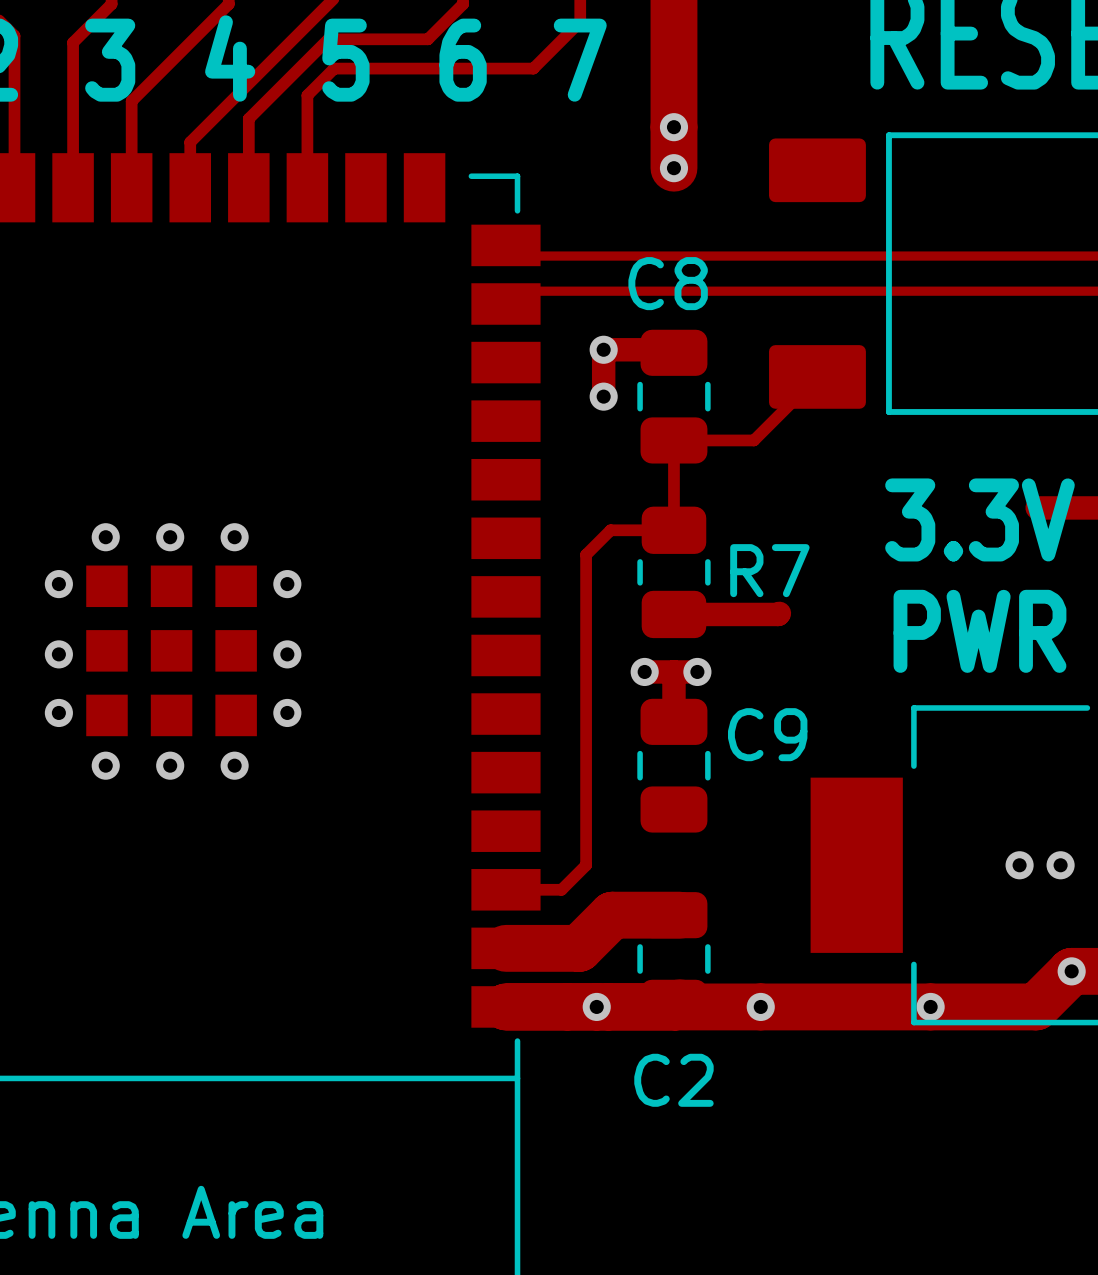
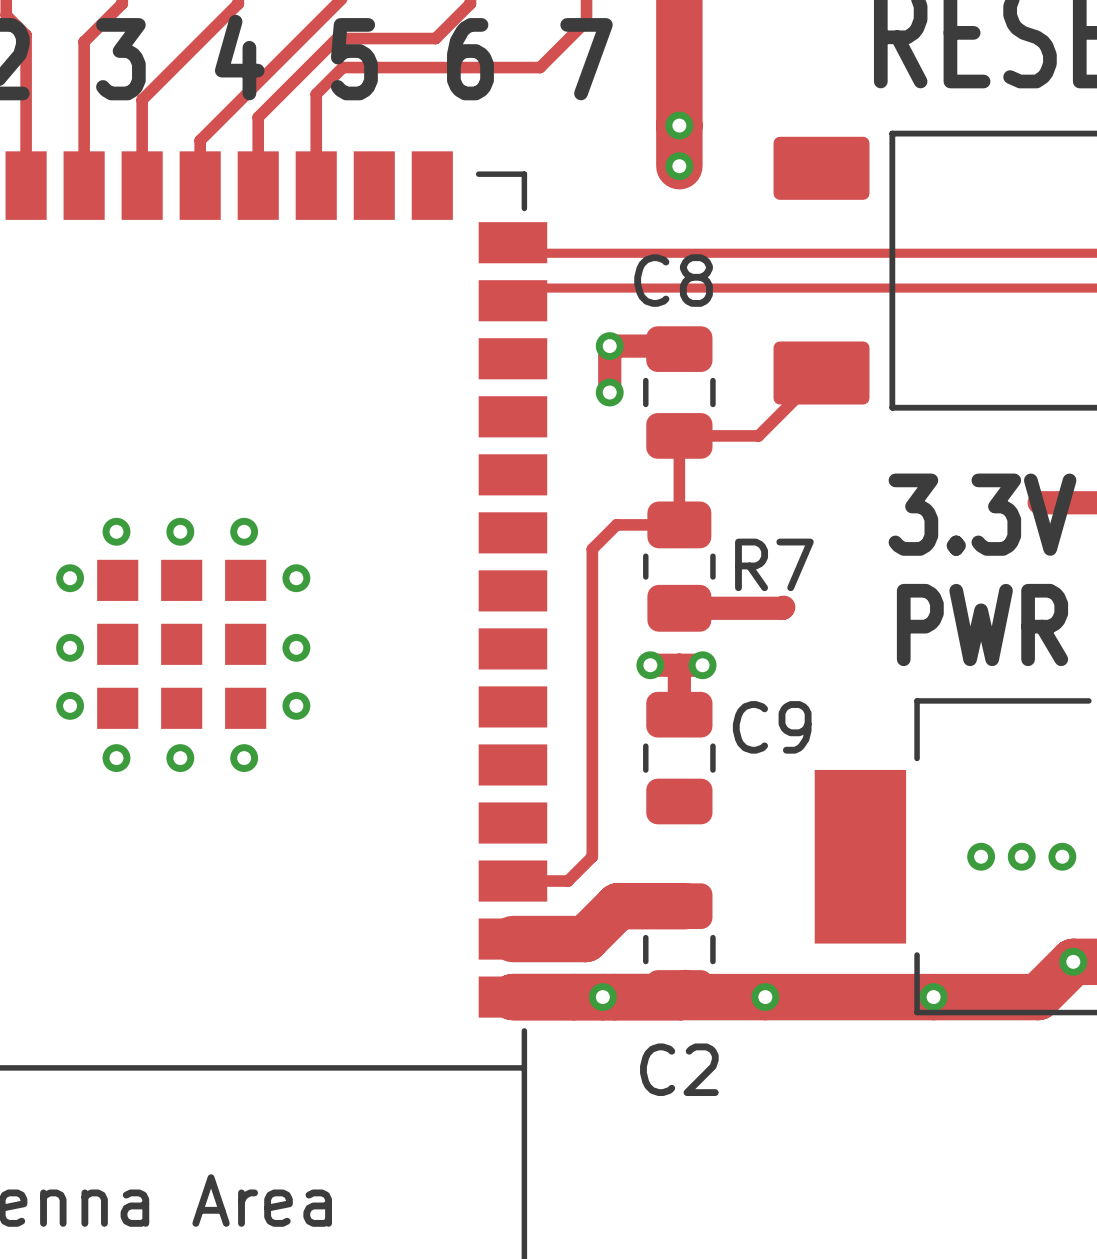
via: none -> (981, 856)

